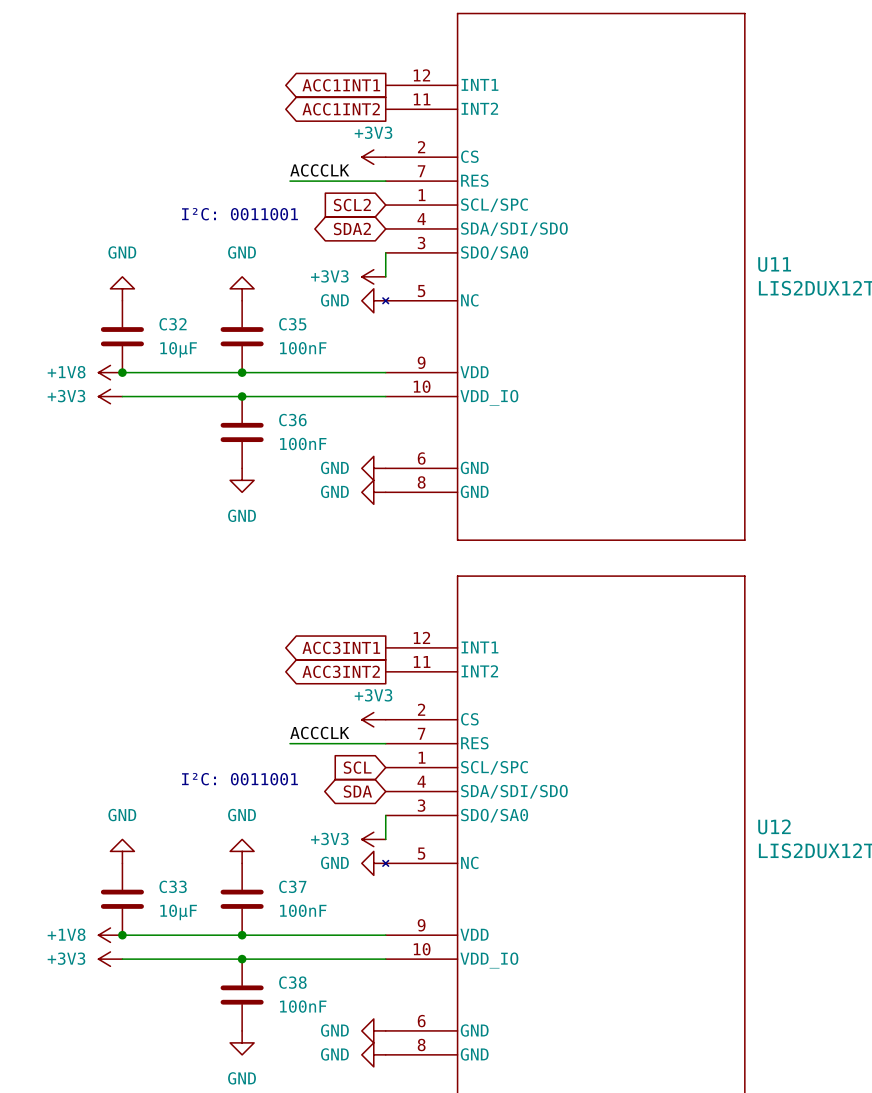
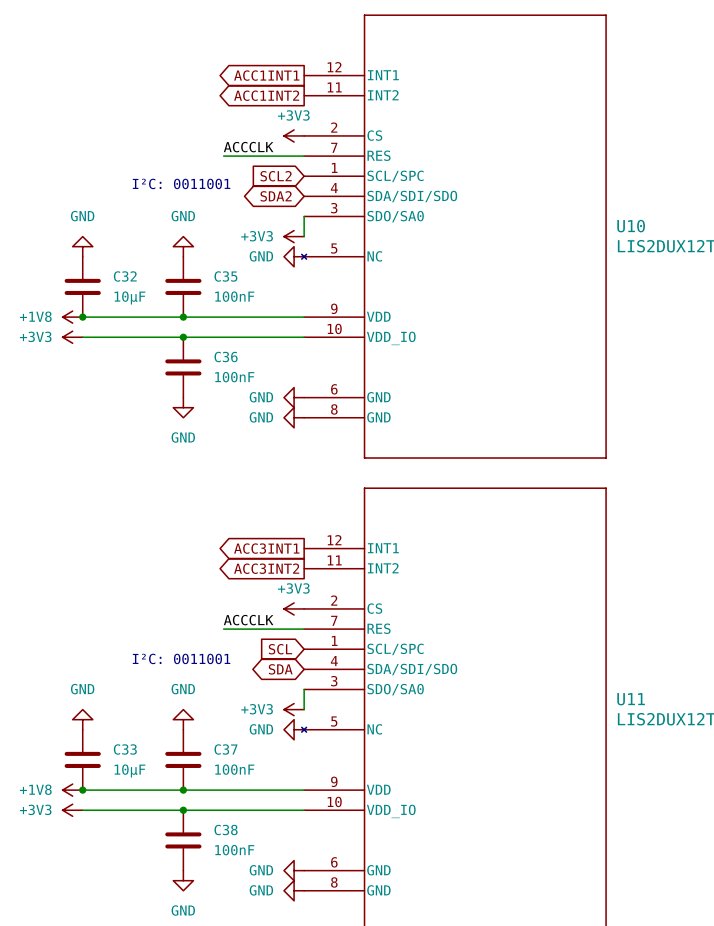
U11 name: U11 (774, 264) -> U10 (631, 226)
U12 name: U12 (774, 826) -> U11 (631, 699)

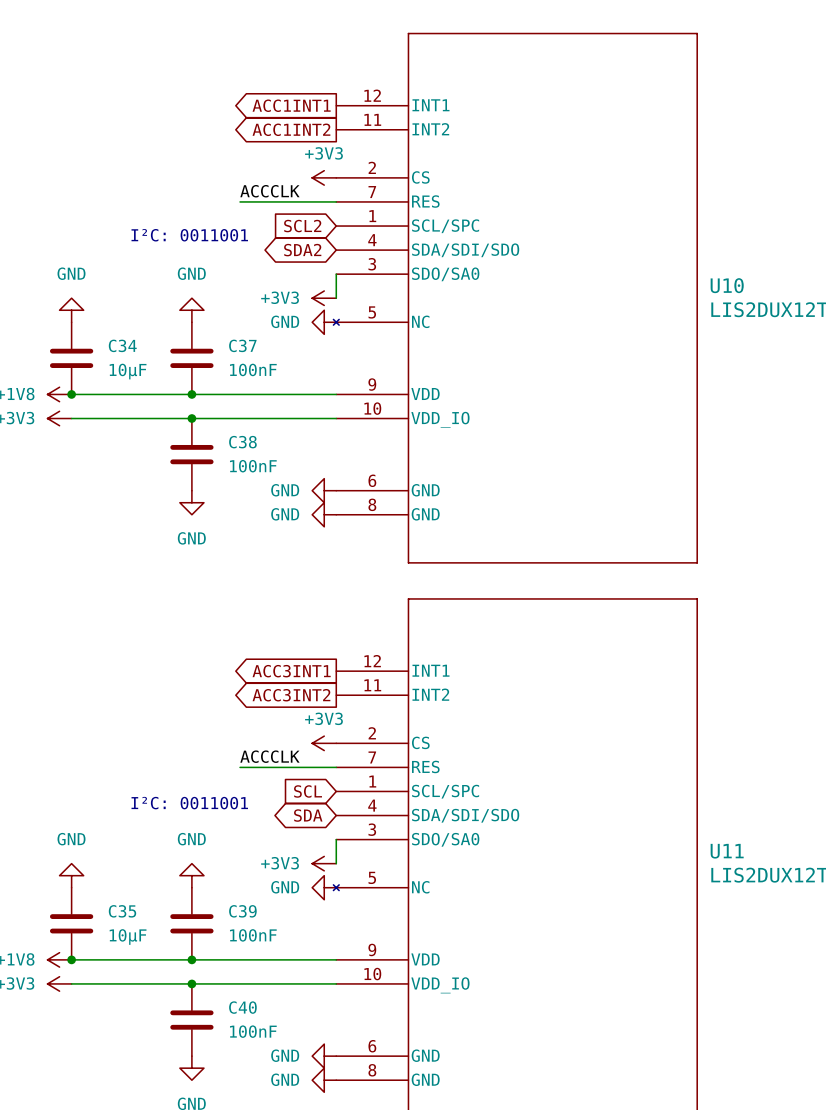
C32 name: C32 (125, 276) -> C34 (122, 345)
C35 name: C35 (225, 276) -> C37 (242, 345)
C36 name: C36 (226, 357) -> C38 (242, 442)
C33 name: C33 (125, 749) -> C35 (122, 911)
C37 name: C37 (225, 749) -> C39 (242, 911)
C38 name: C38 (226, 830) -> C40 (242, 1007)

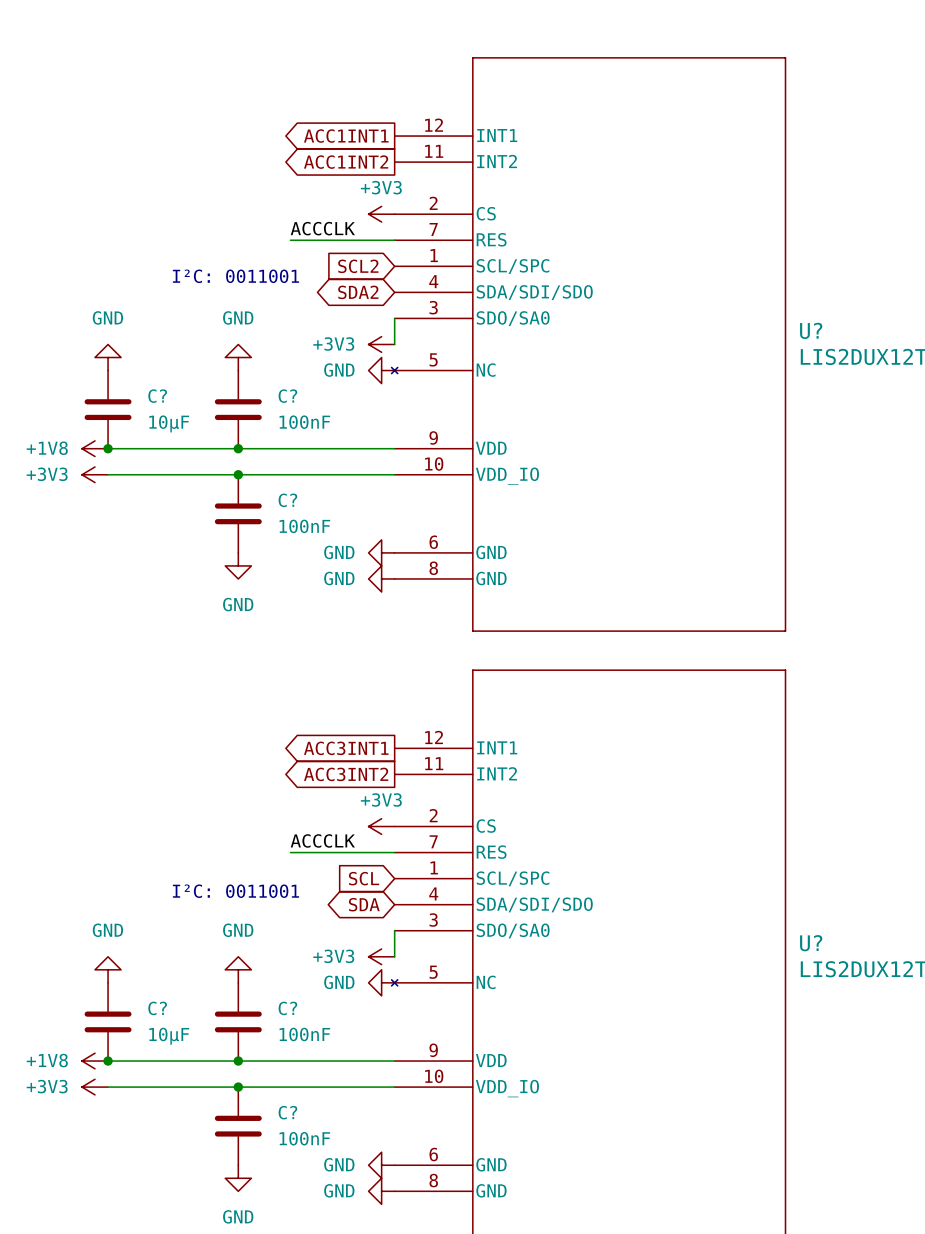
U10 name: U10 (727, 285) -> U? (811, 330)
C34 name: C34 (122, 345) -> C? (157, 396)
C37 name: C37 (242, 345) -> C? (287, 396)
C38 name: C38 (242, 442) -> C? (287, 500)
U11 name: U11 (727, 851) -> U? (811, 943)
C35 name: C35 (122, 911) -> C? (157, 1008)
C39 name: C39 (242, 911) -> C? (287, 1008)
C40 name: C40 (242, 1007) -> C? (287, 1112)

